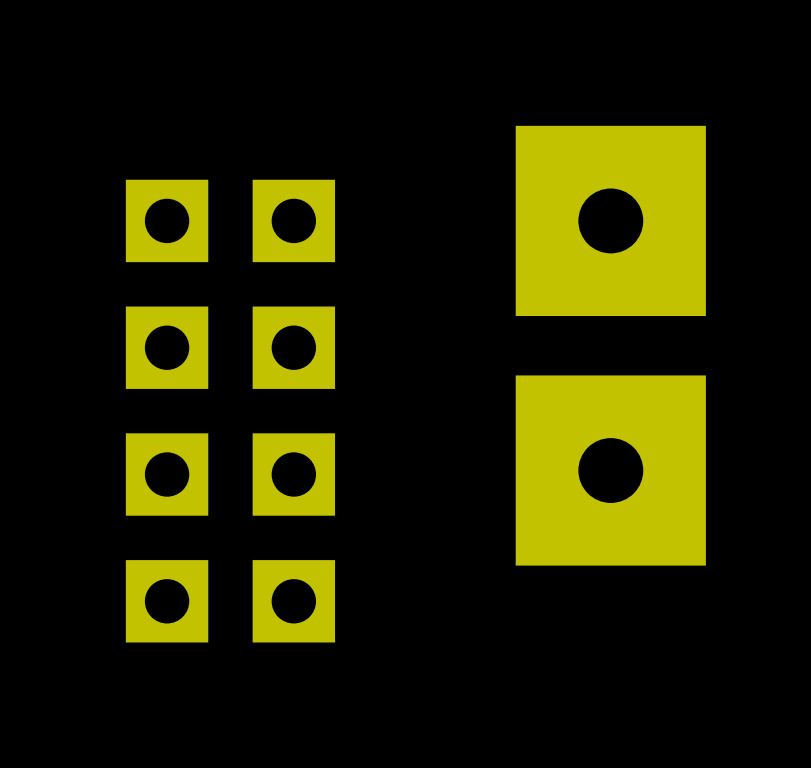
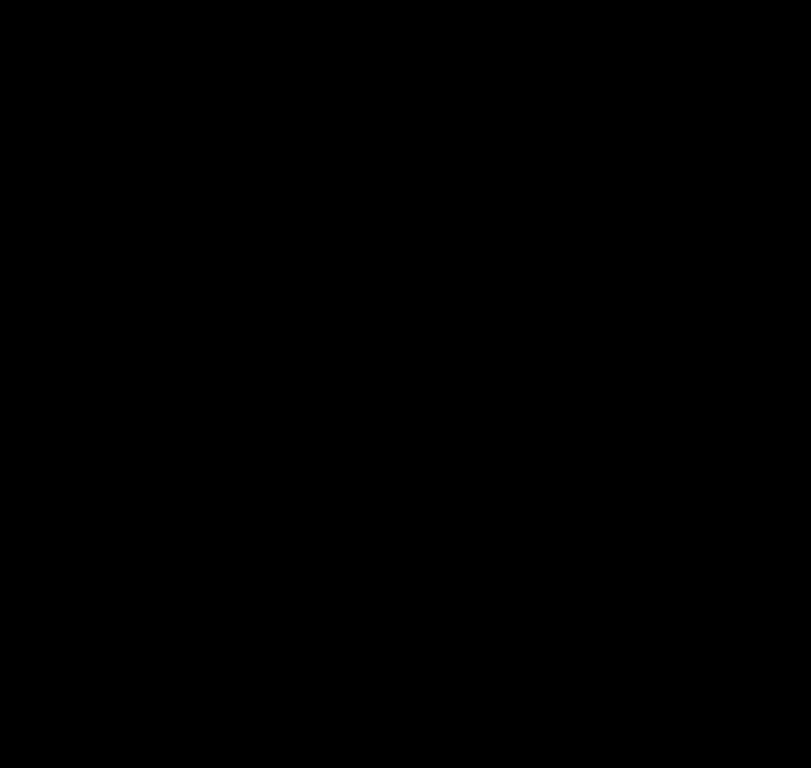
part: (610, 345) -> none
part: (230, 411) -> none

